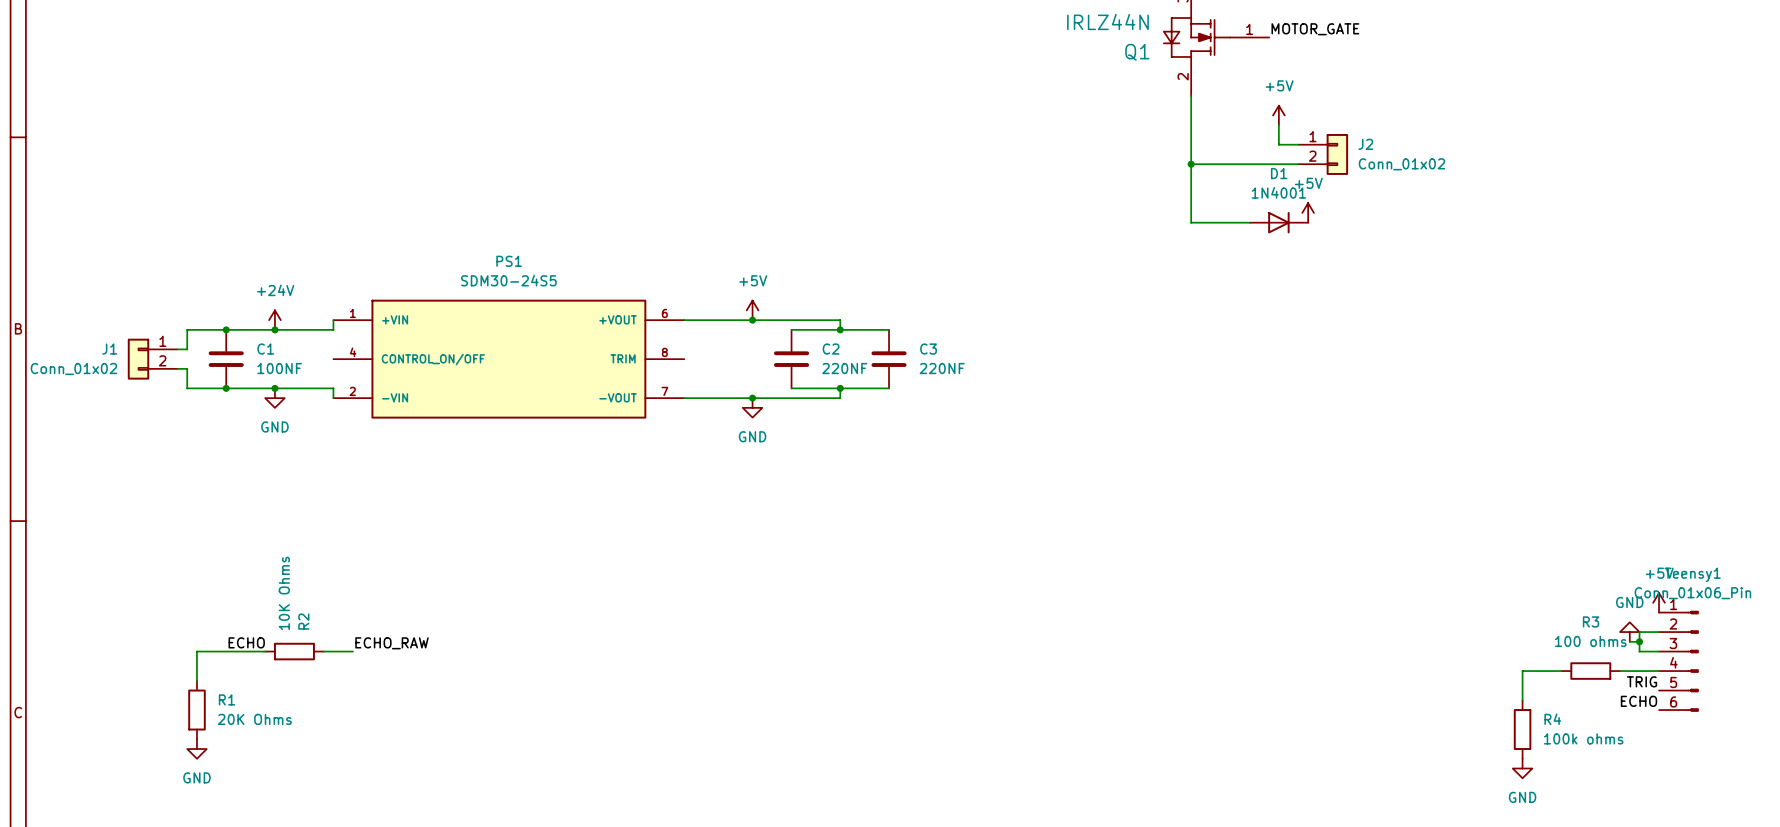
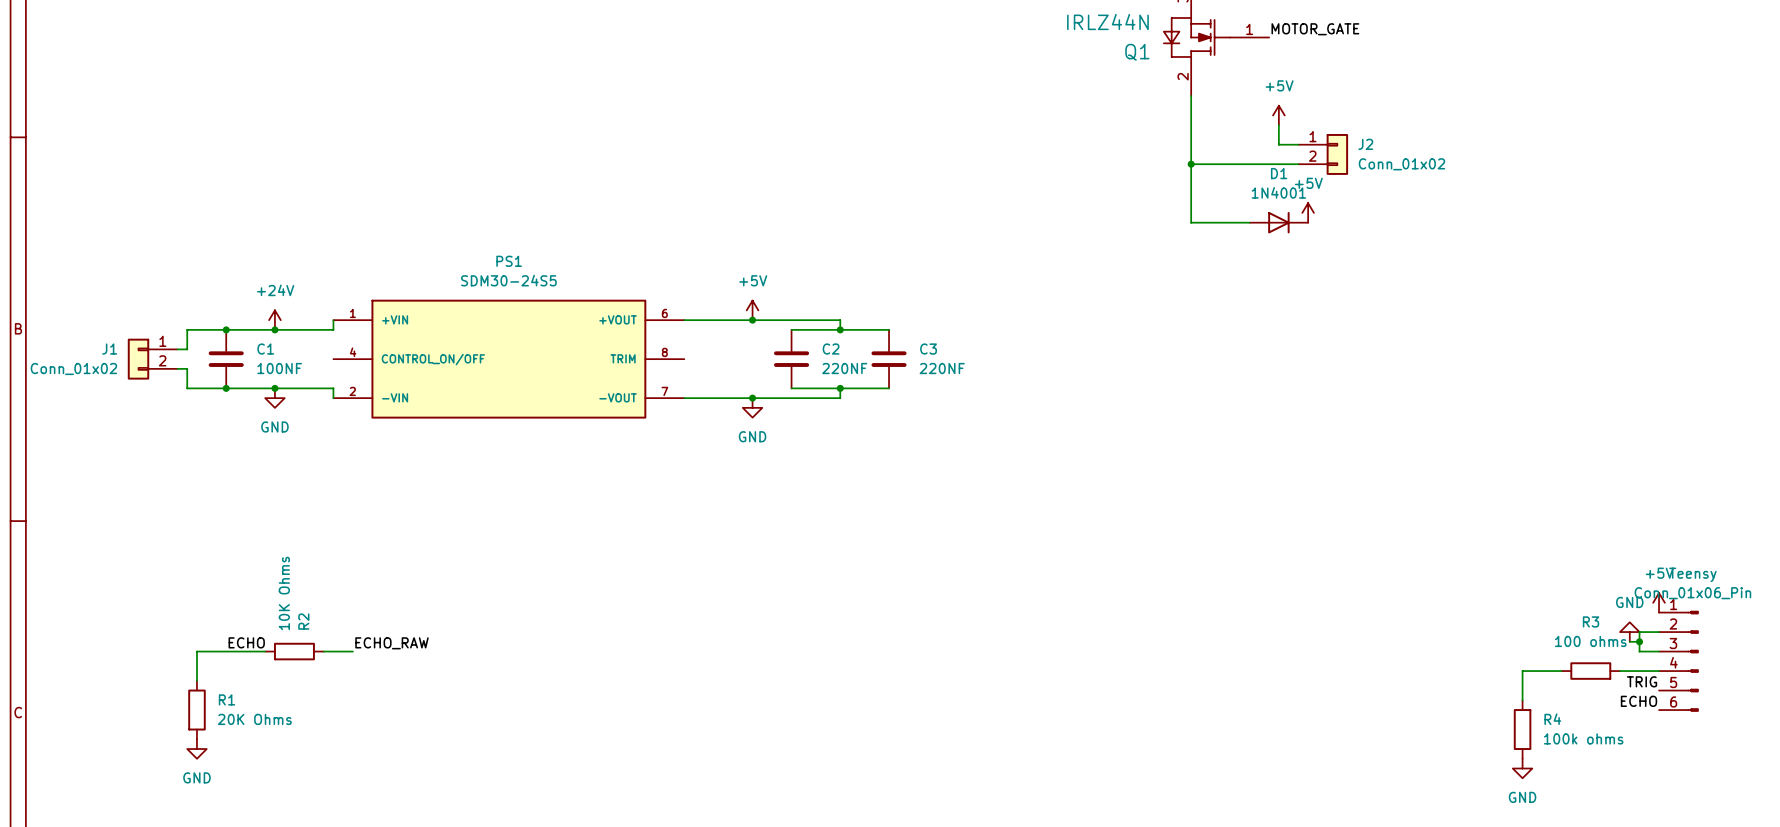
Teensy1 name: Teensy1 (1692, 574) -> Teensy (1692, 574)

